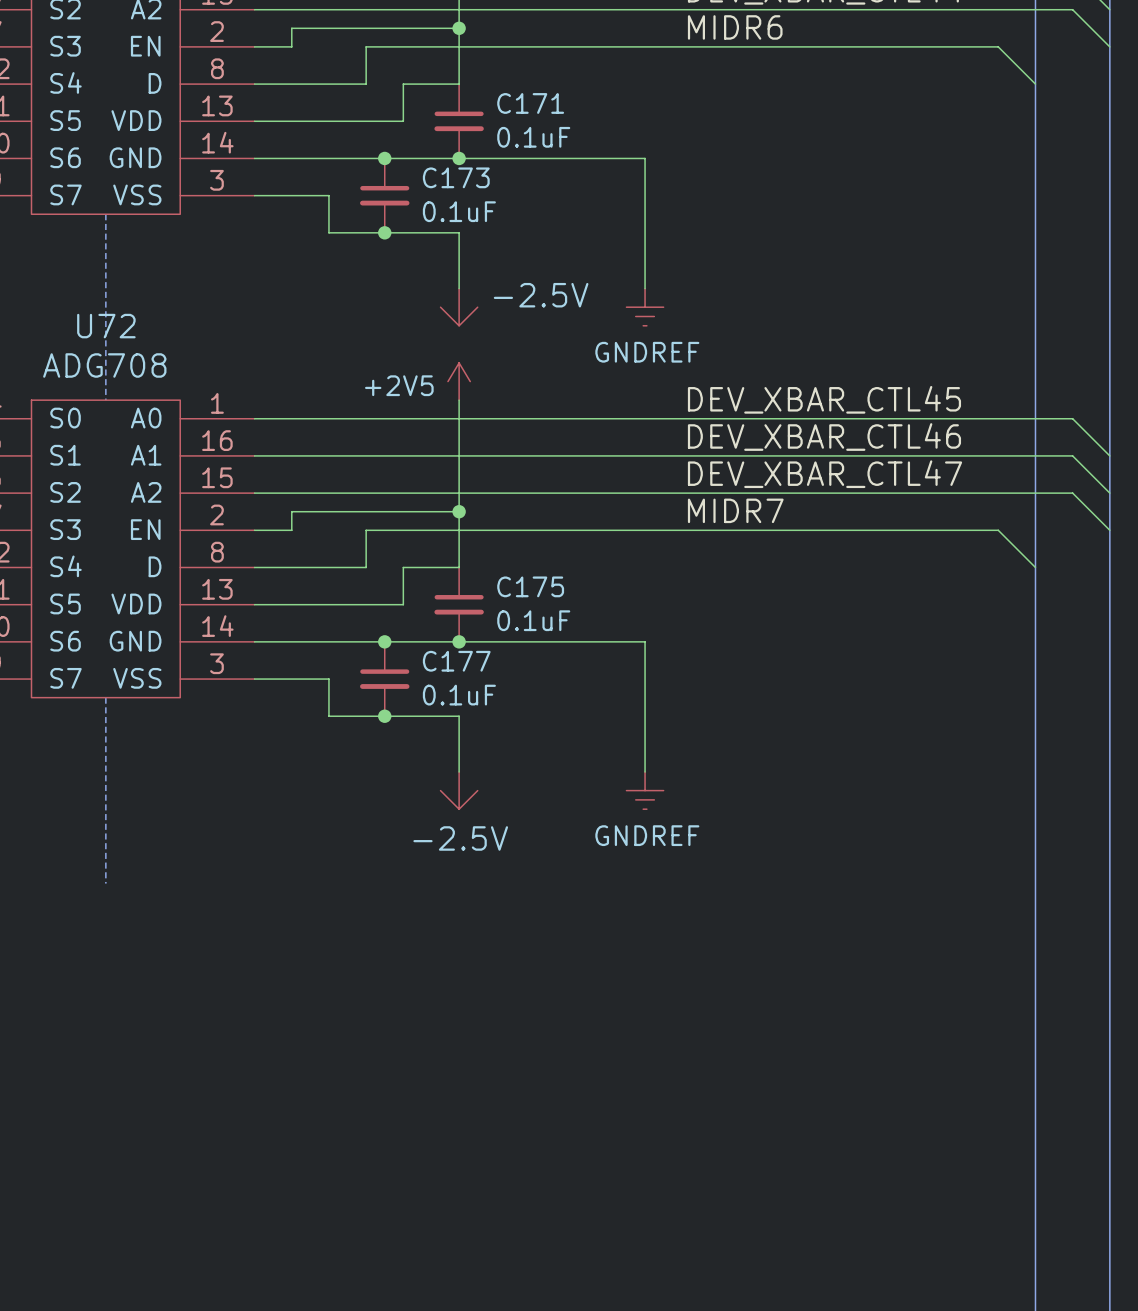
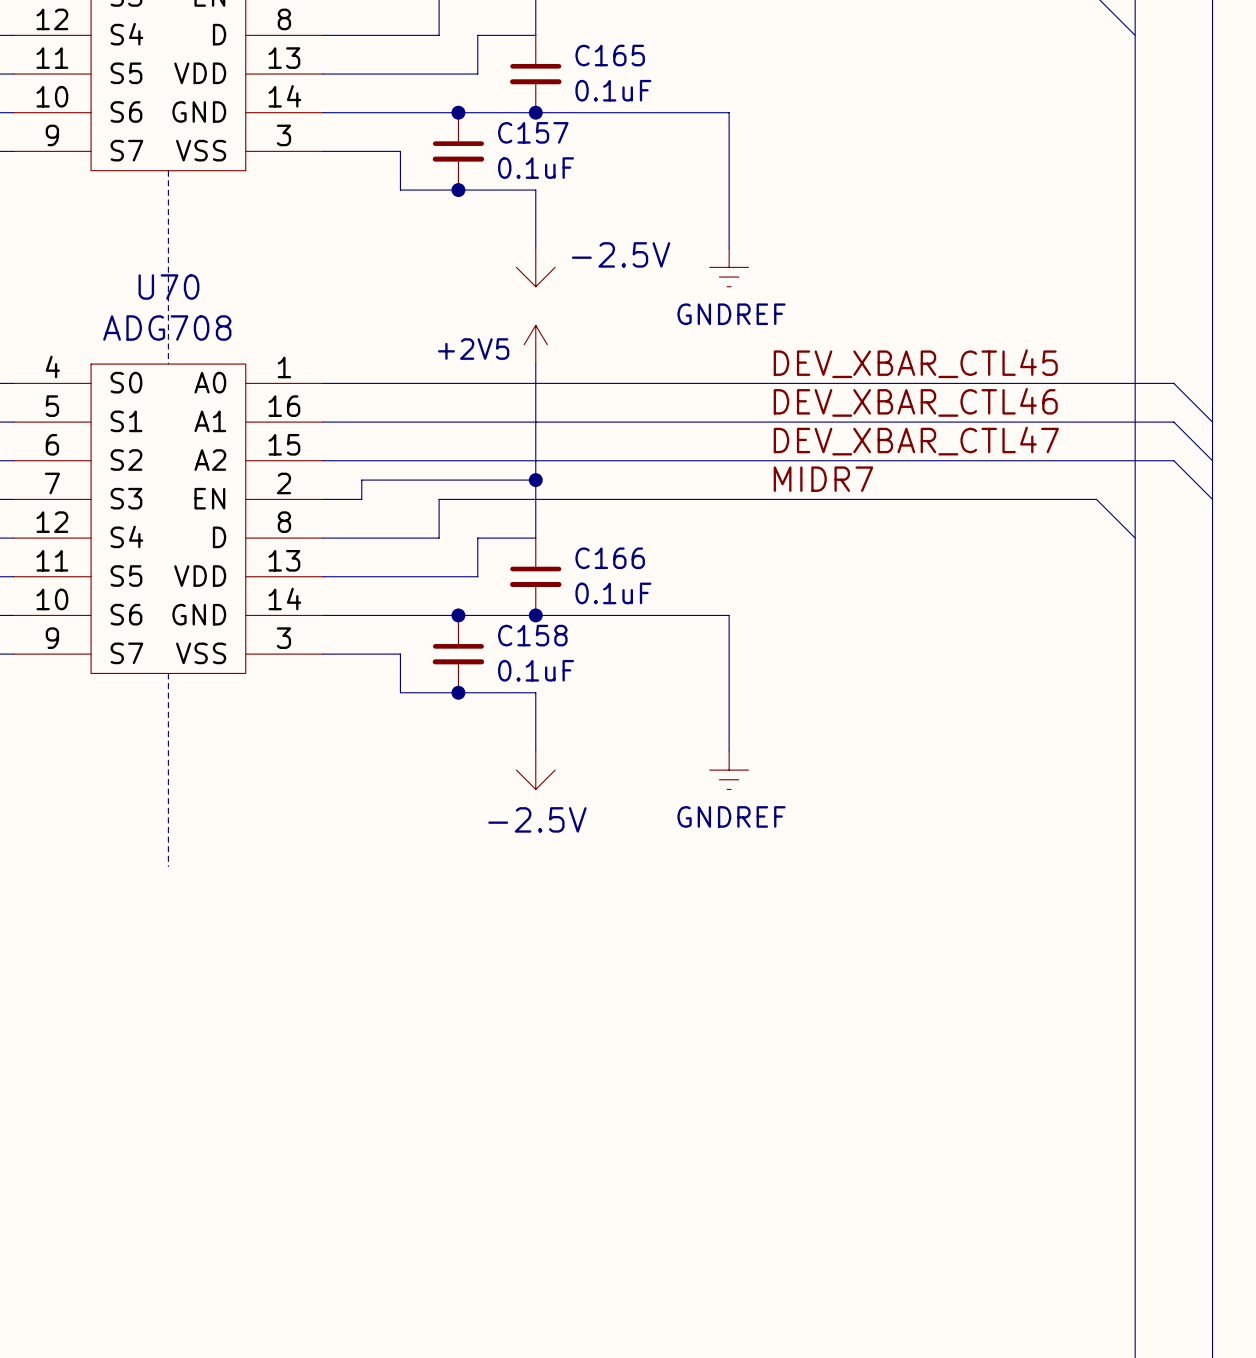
C171 name: C171 (530, 103) -> C165 (610, 55)
C173 name: C173 (456, 177) -> C157 (533, 132)
U72 name: U72 (106, 326) -> U70 (168, 287)
C175 name: C175 (530, 586) -> C166 (610, 558)
C177 name: C177 (456, 661) -> C158 (532, 635)

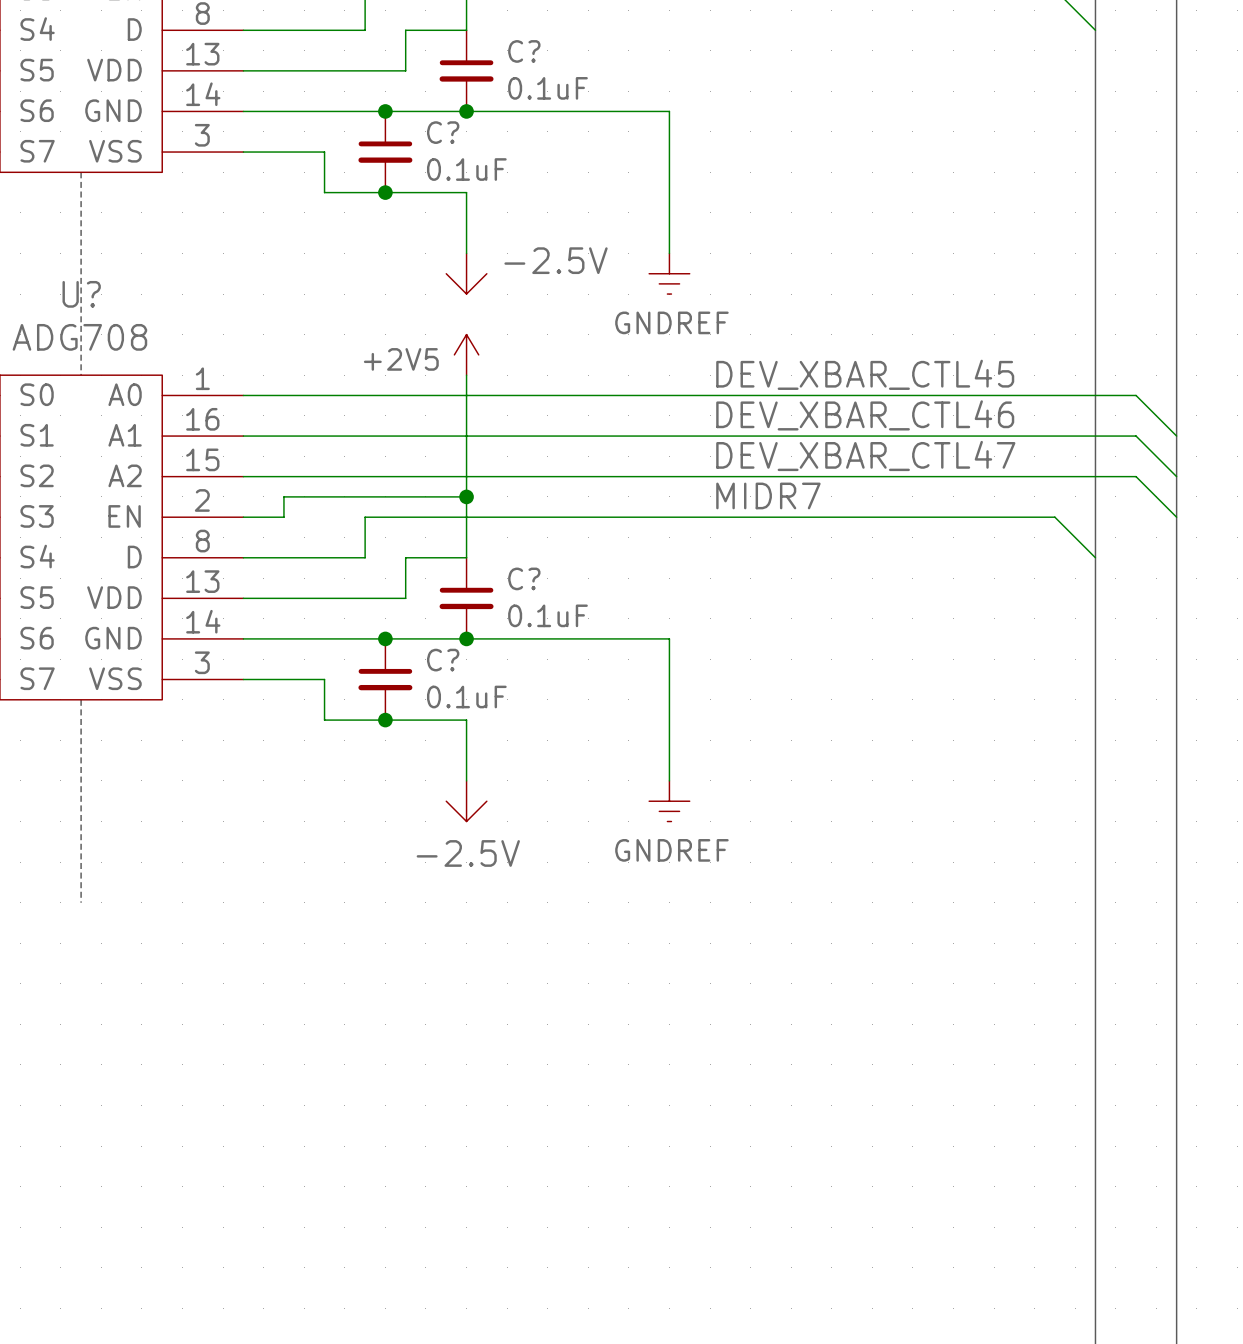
C165 name: C165 (610, 55) -> C? (524, 51)
C157 name: C157 (533, 132) -> C? (443, 132)
U70 name: U70 (168, 287) -> U? (81, 294)
C166 name: C166 (610, 558) -> C? (524, 578)
C158 name: C158 (532, 635) -> C? (443, 660)

